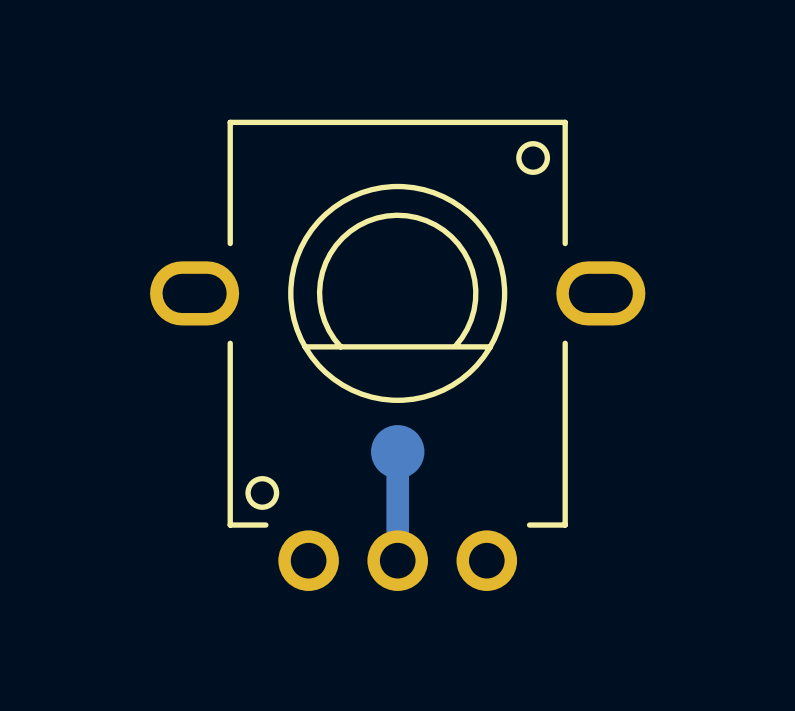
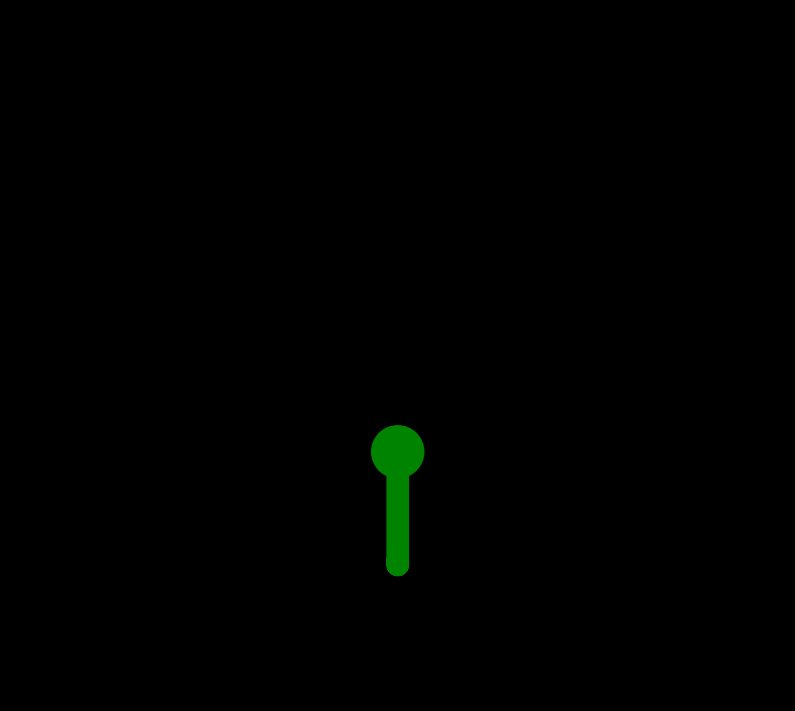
part: (397, 355) -> none

